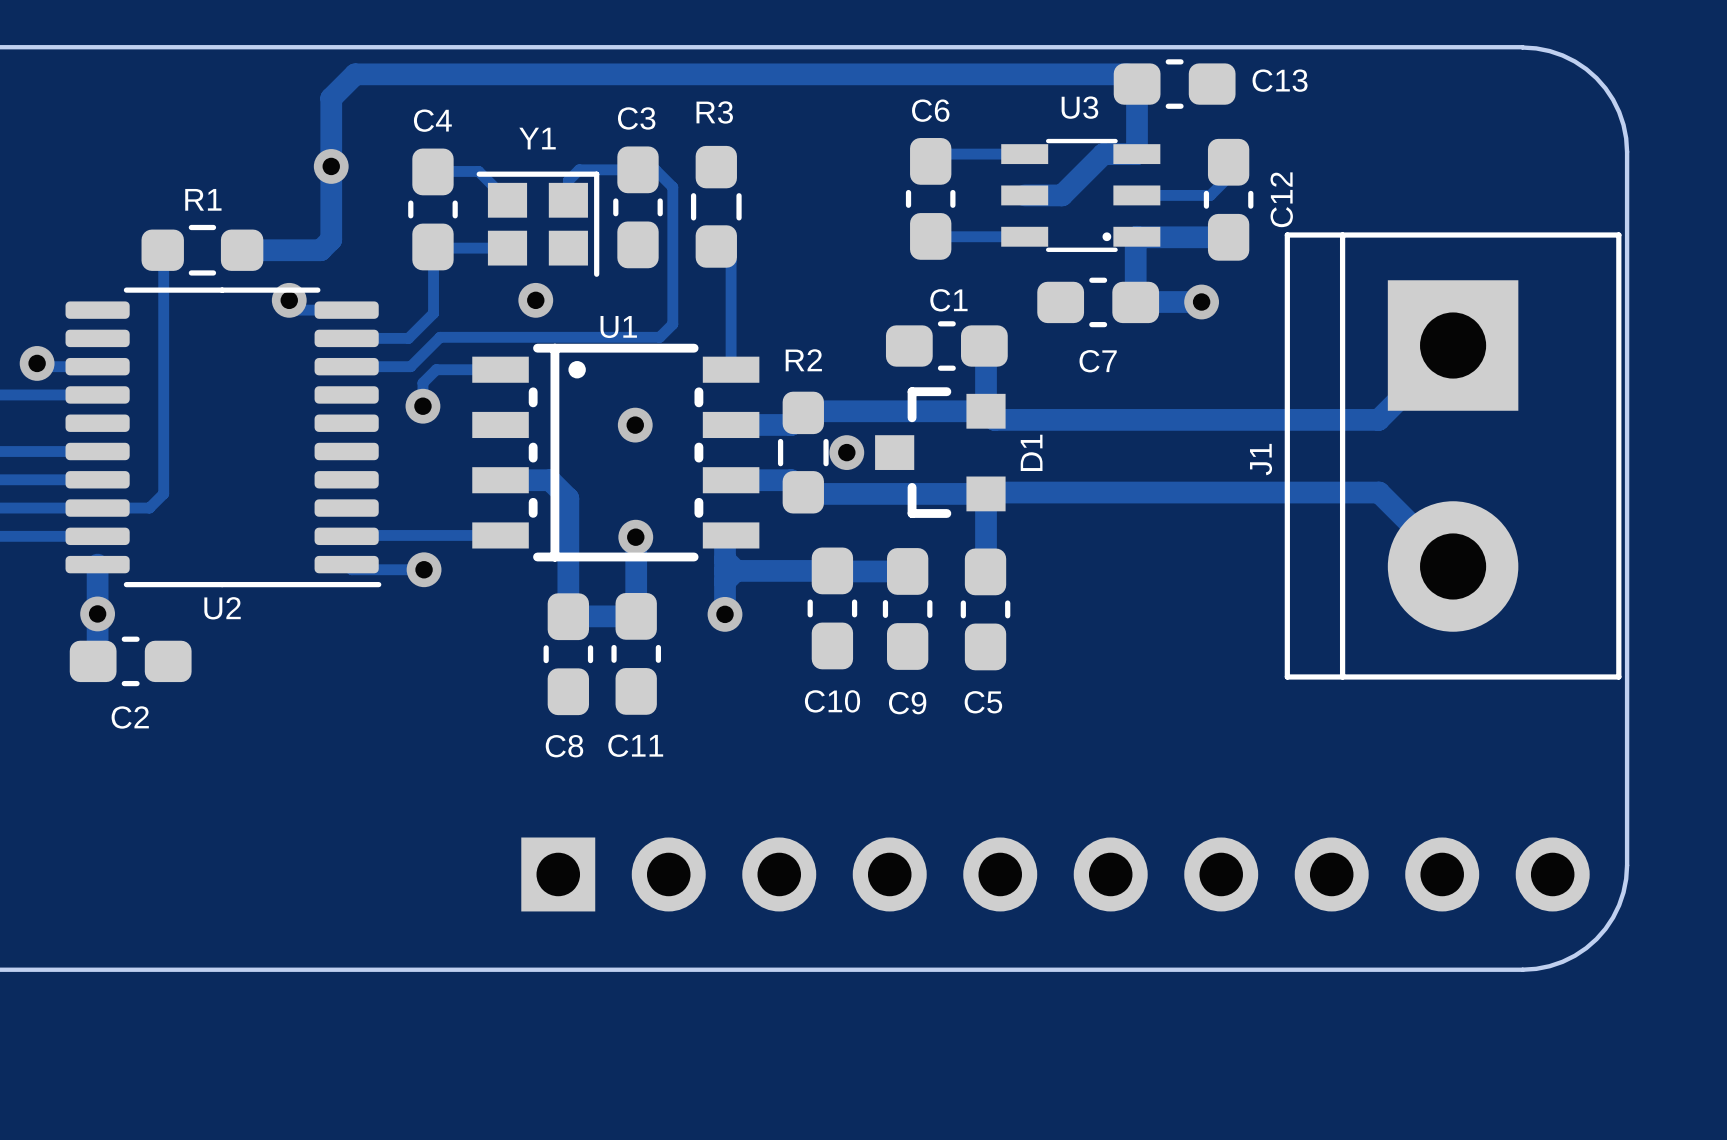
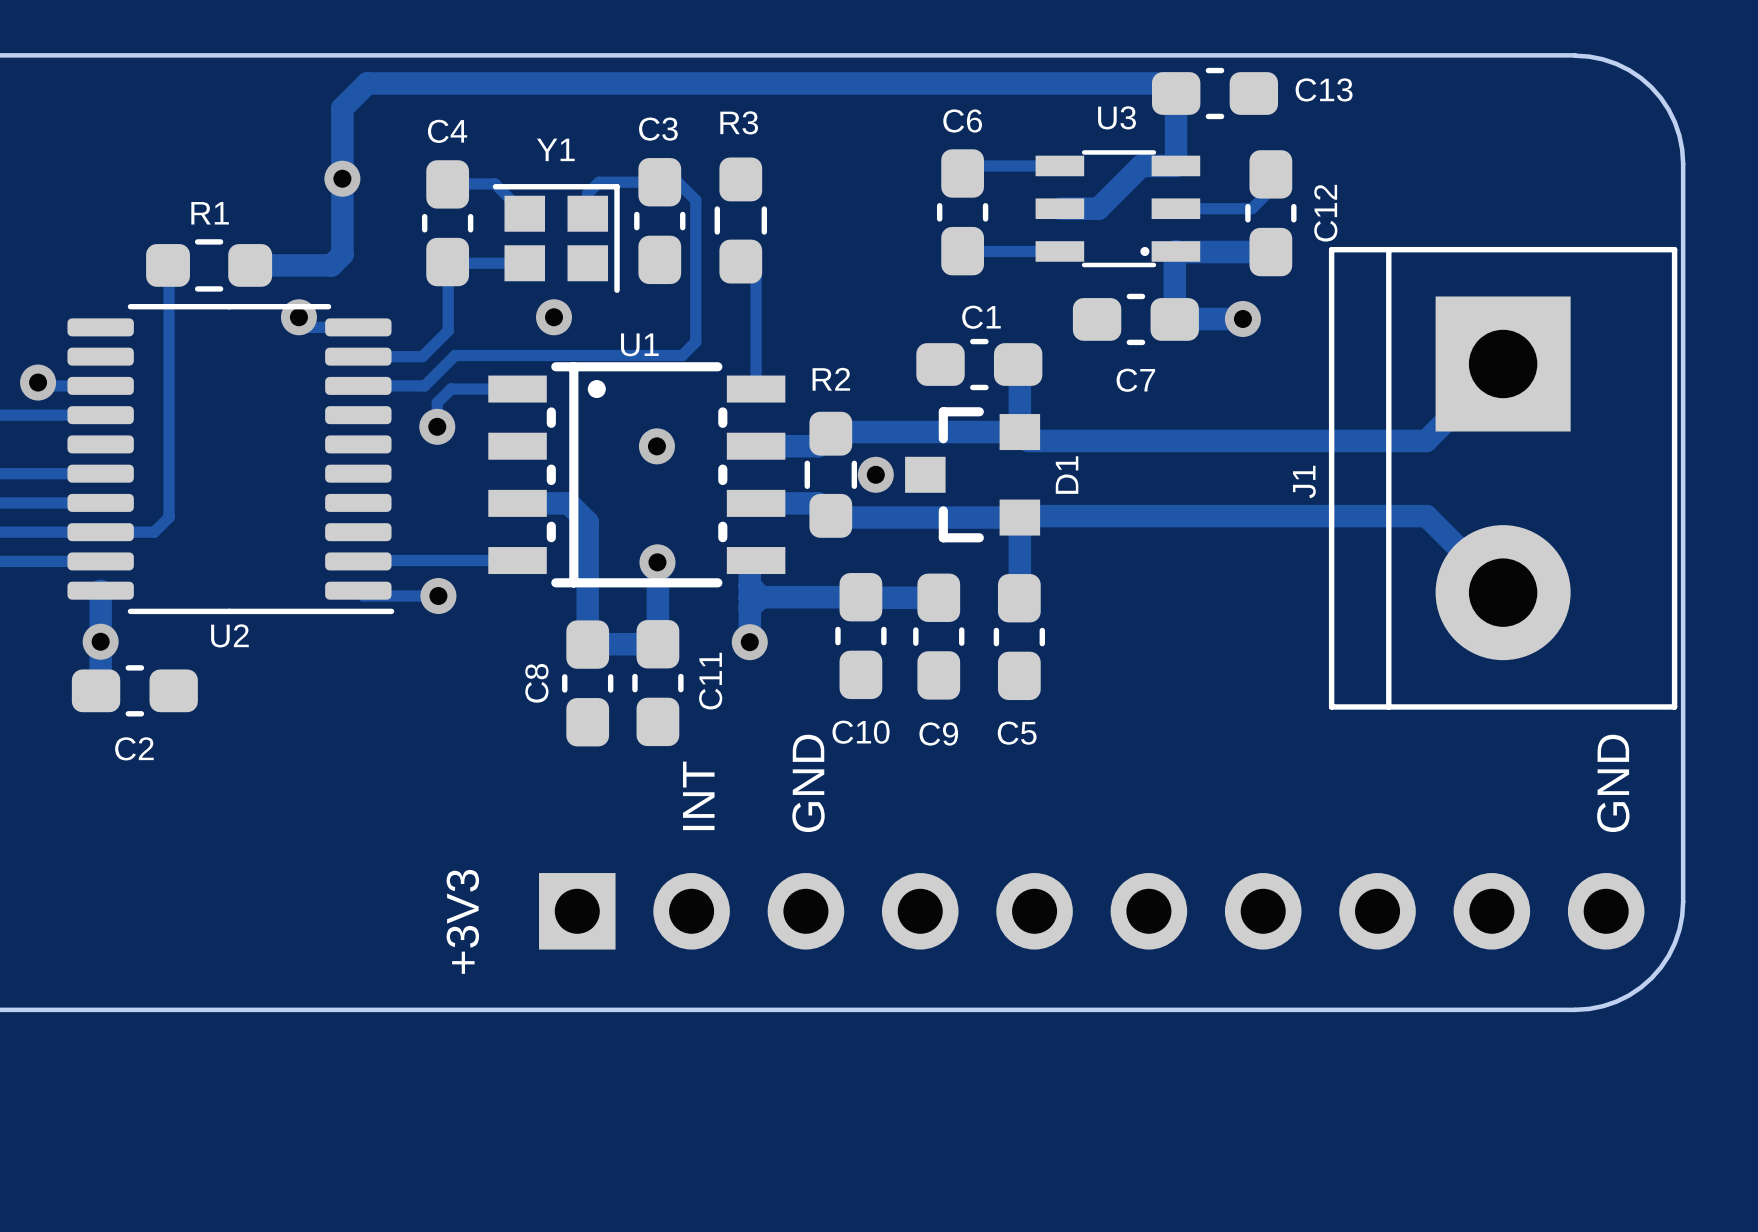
C11 name rotation: 0° (635, 745) -> 90° counterclockwise (710, 681)
C11 name position: C11 (635, 745) -> C11 (710, 681)
C8 name rotation: 0° (564, 746) -> 90° counterclockwise (536, 683)
C8 name position: C8 (564, 746) -> C8 (536, 683)
text: none -> GND (808, 783)
text: none -> GND (1613, 783)
text: none -> INT (698, 795)
text: none -> +3V3 (462, 921)

